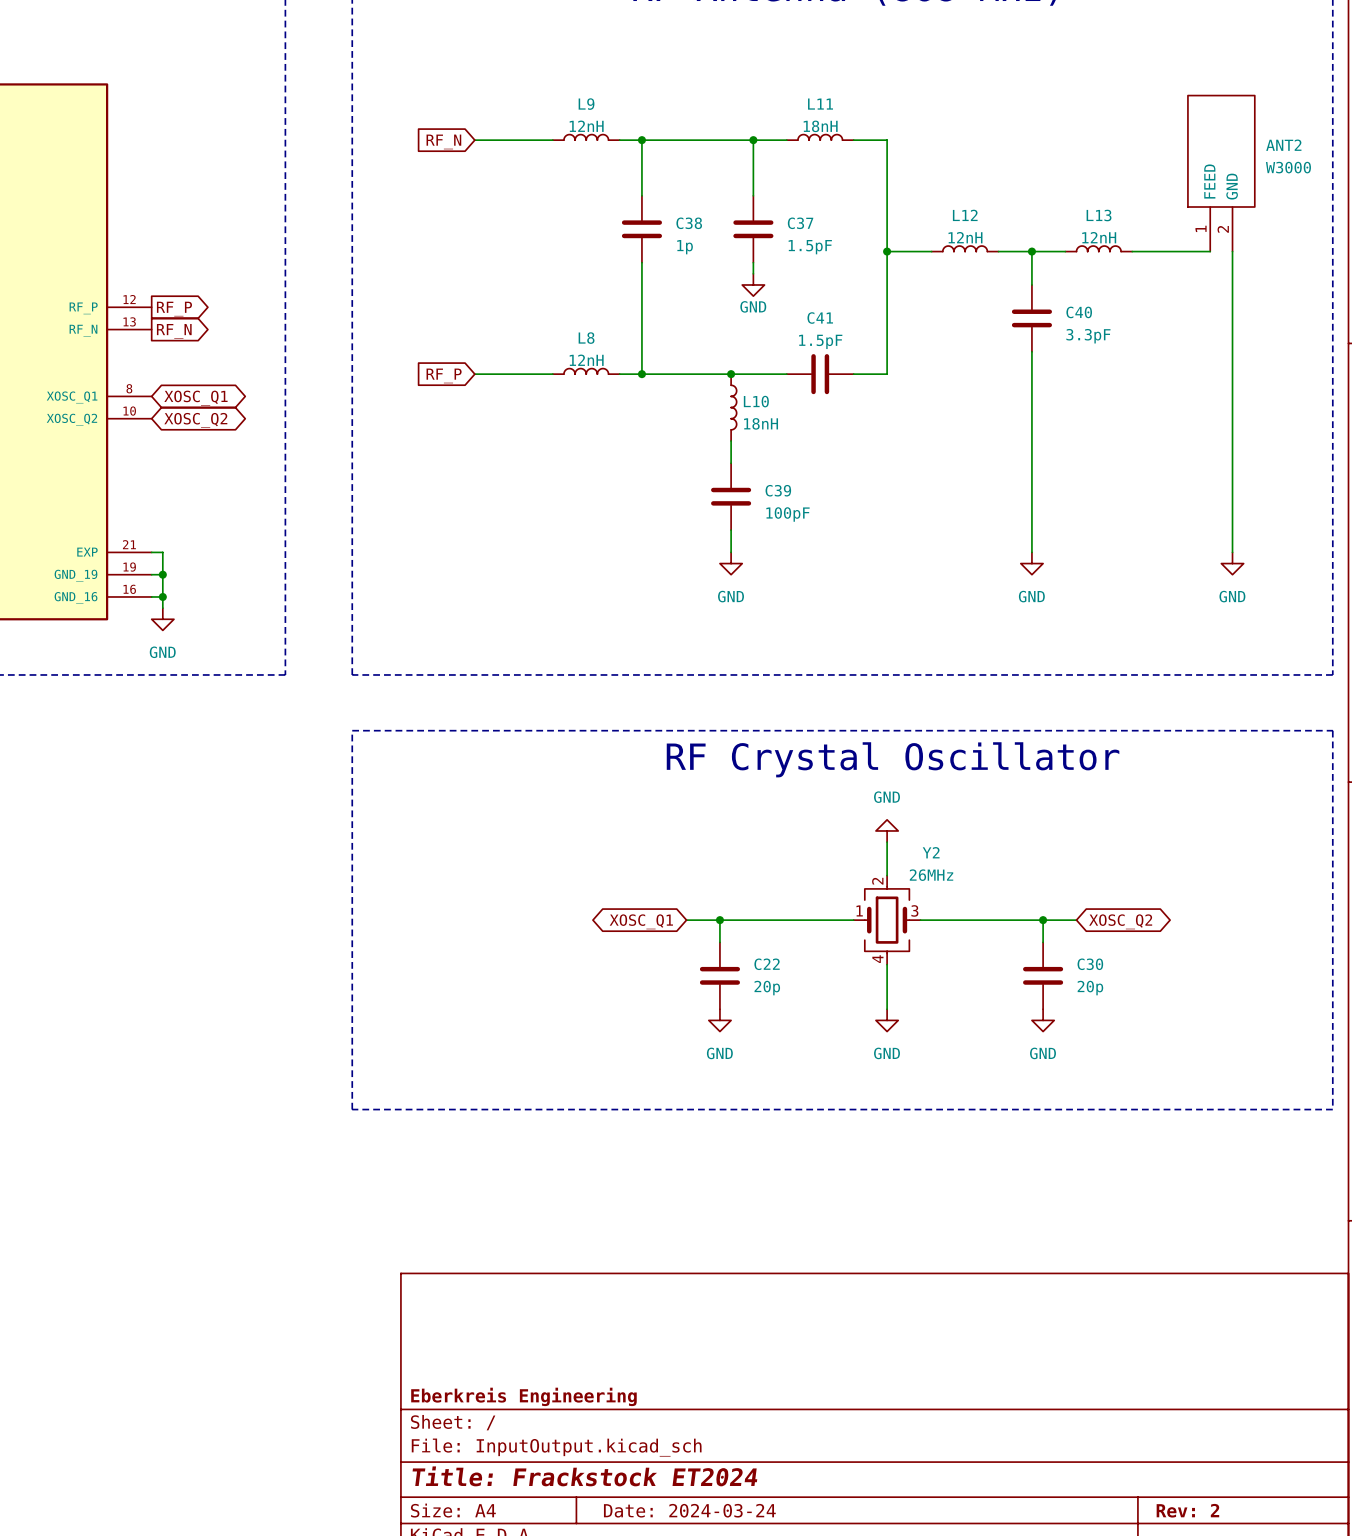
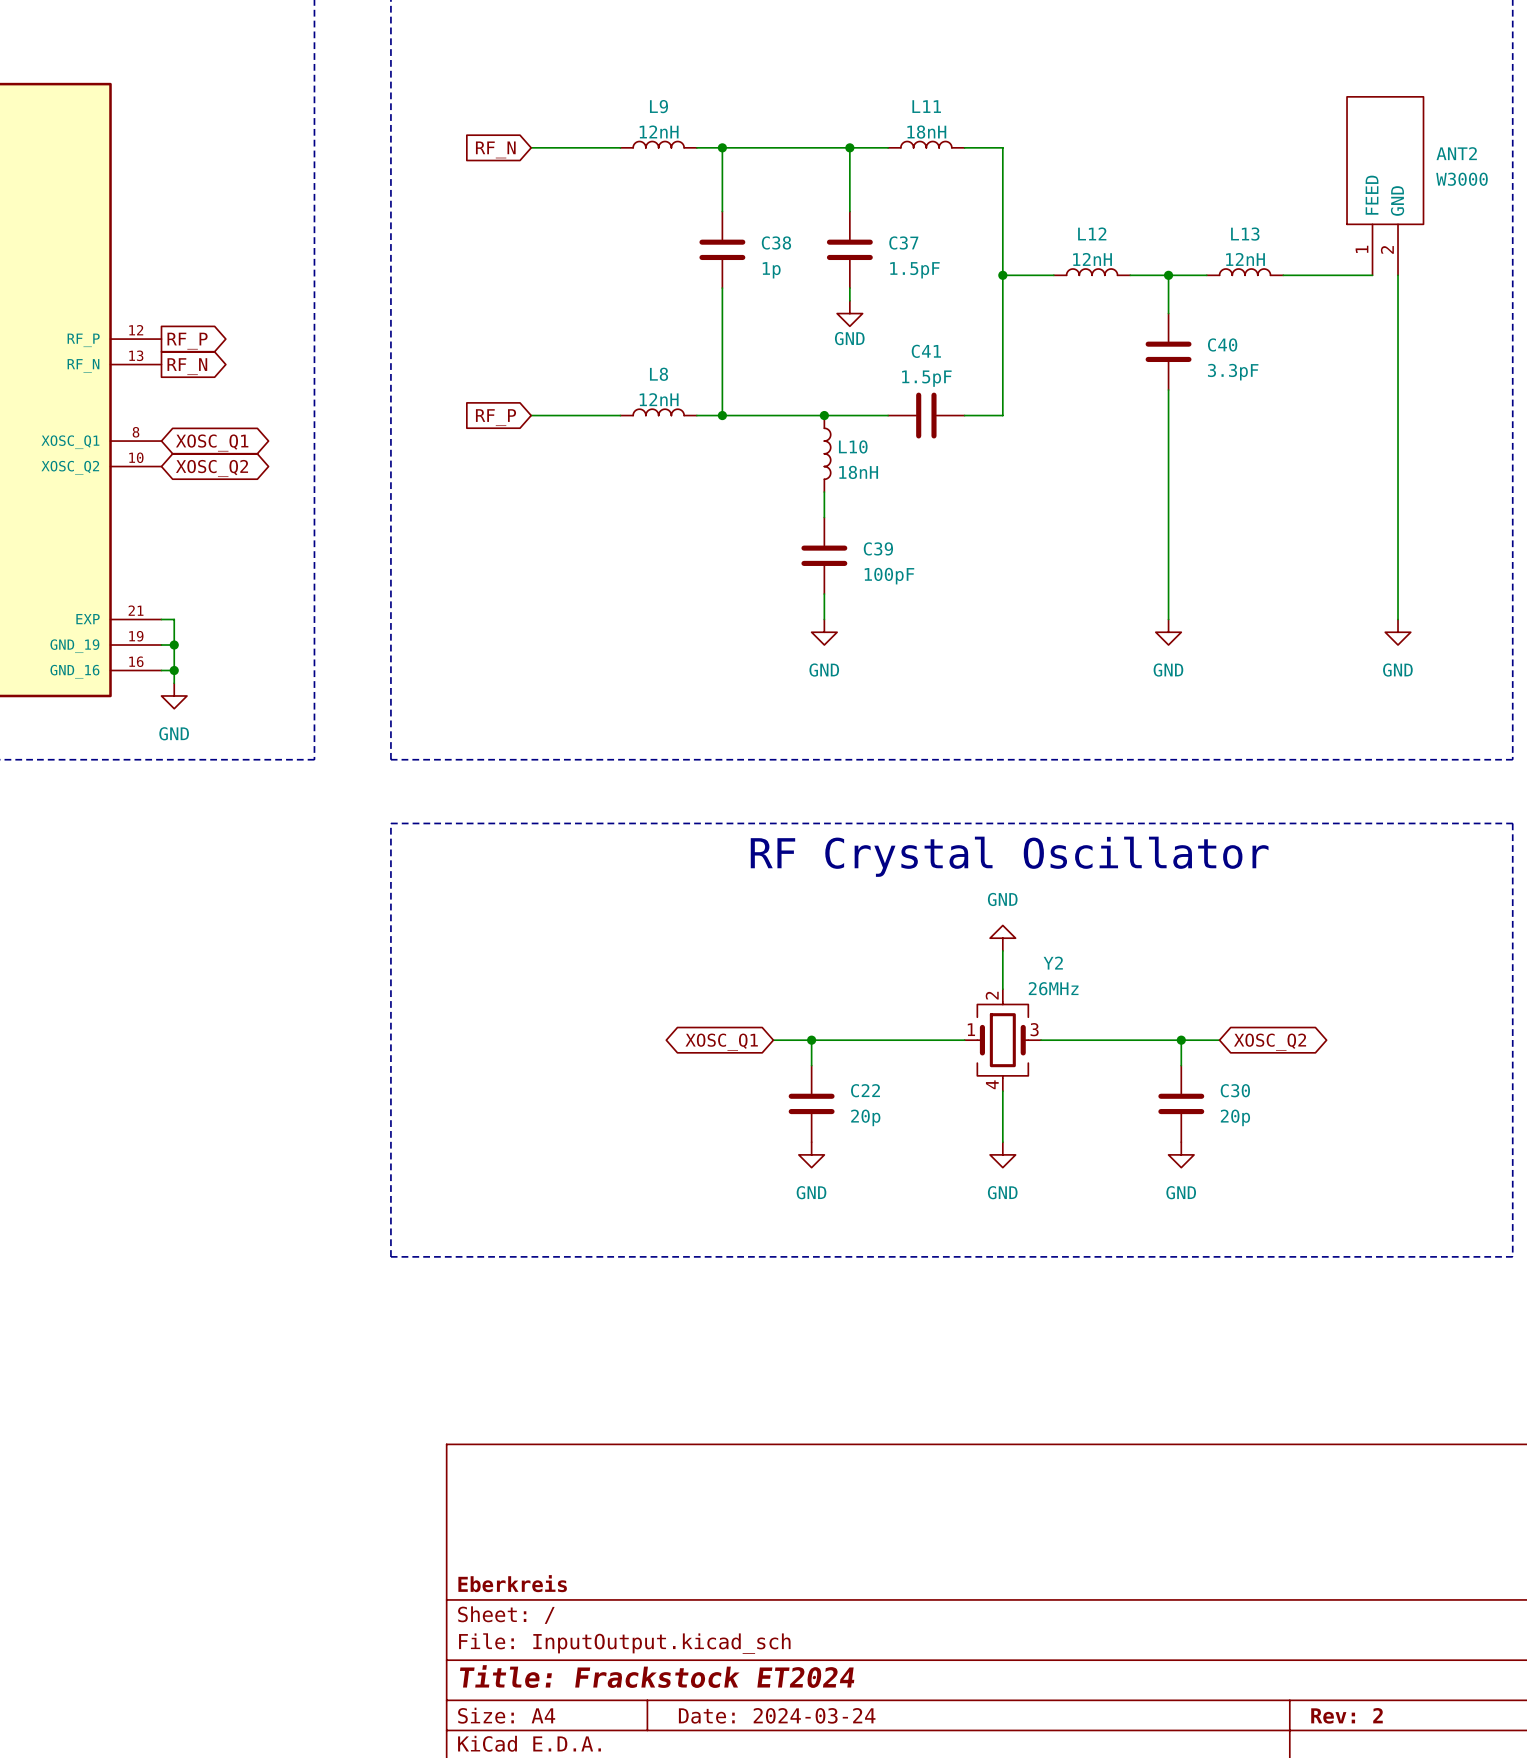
title block: Eberkreis Engineering (523, 1396) -> Eberkreis (512, 1583)

